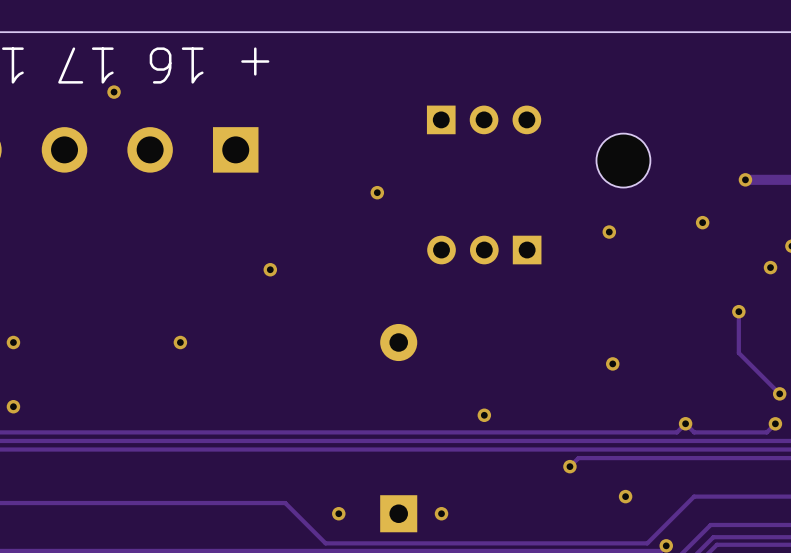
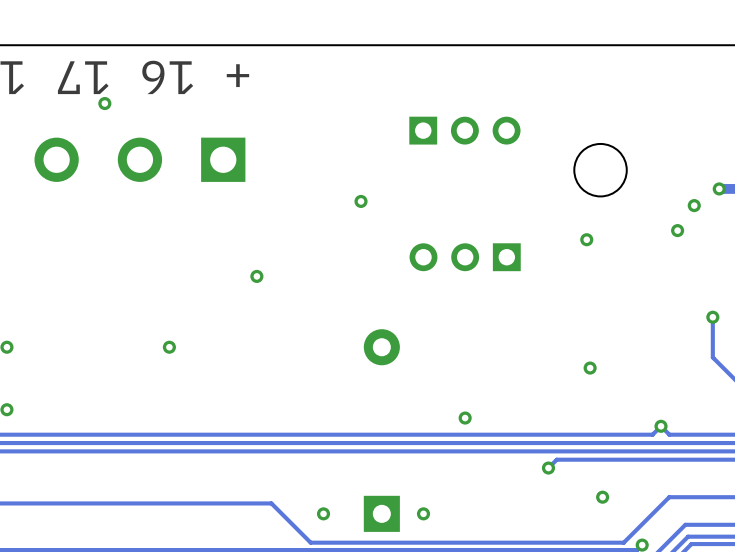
via: none -> (694, 205)

